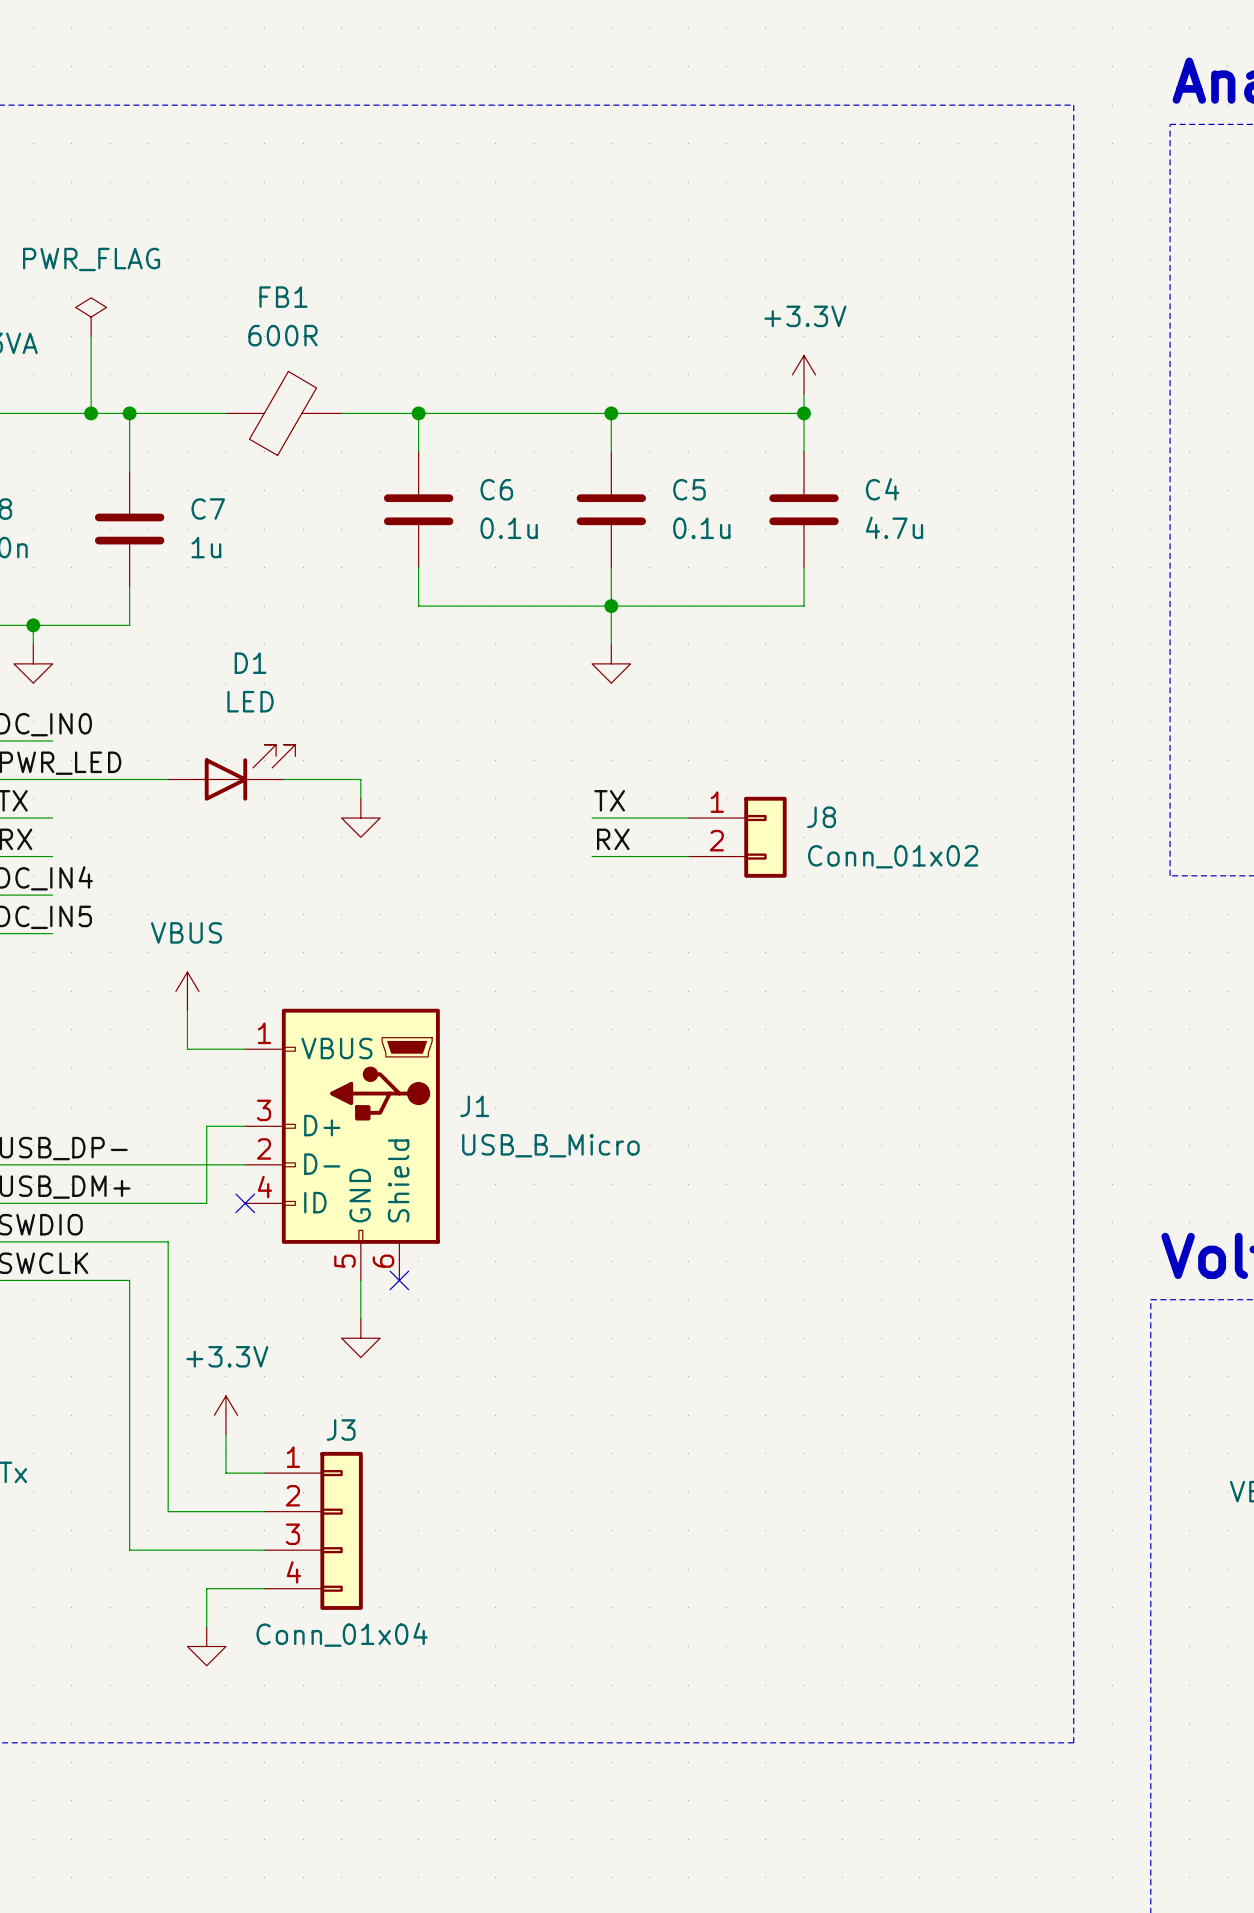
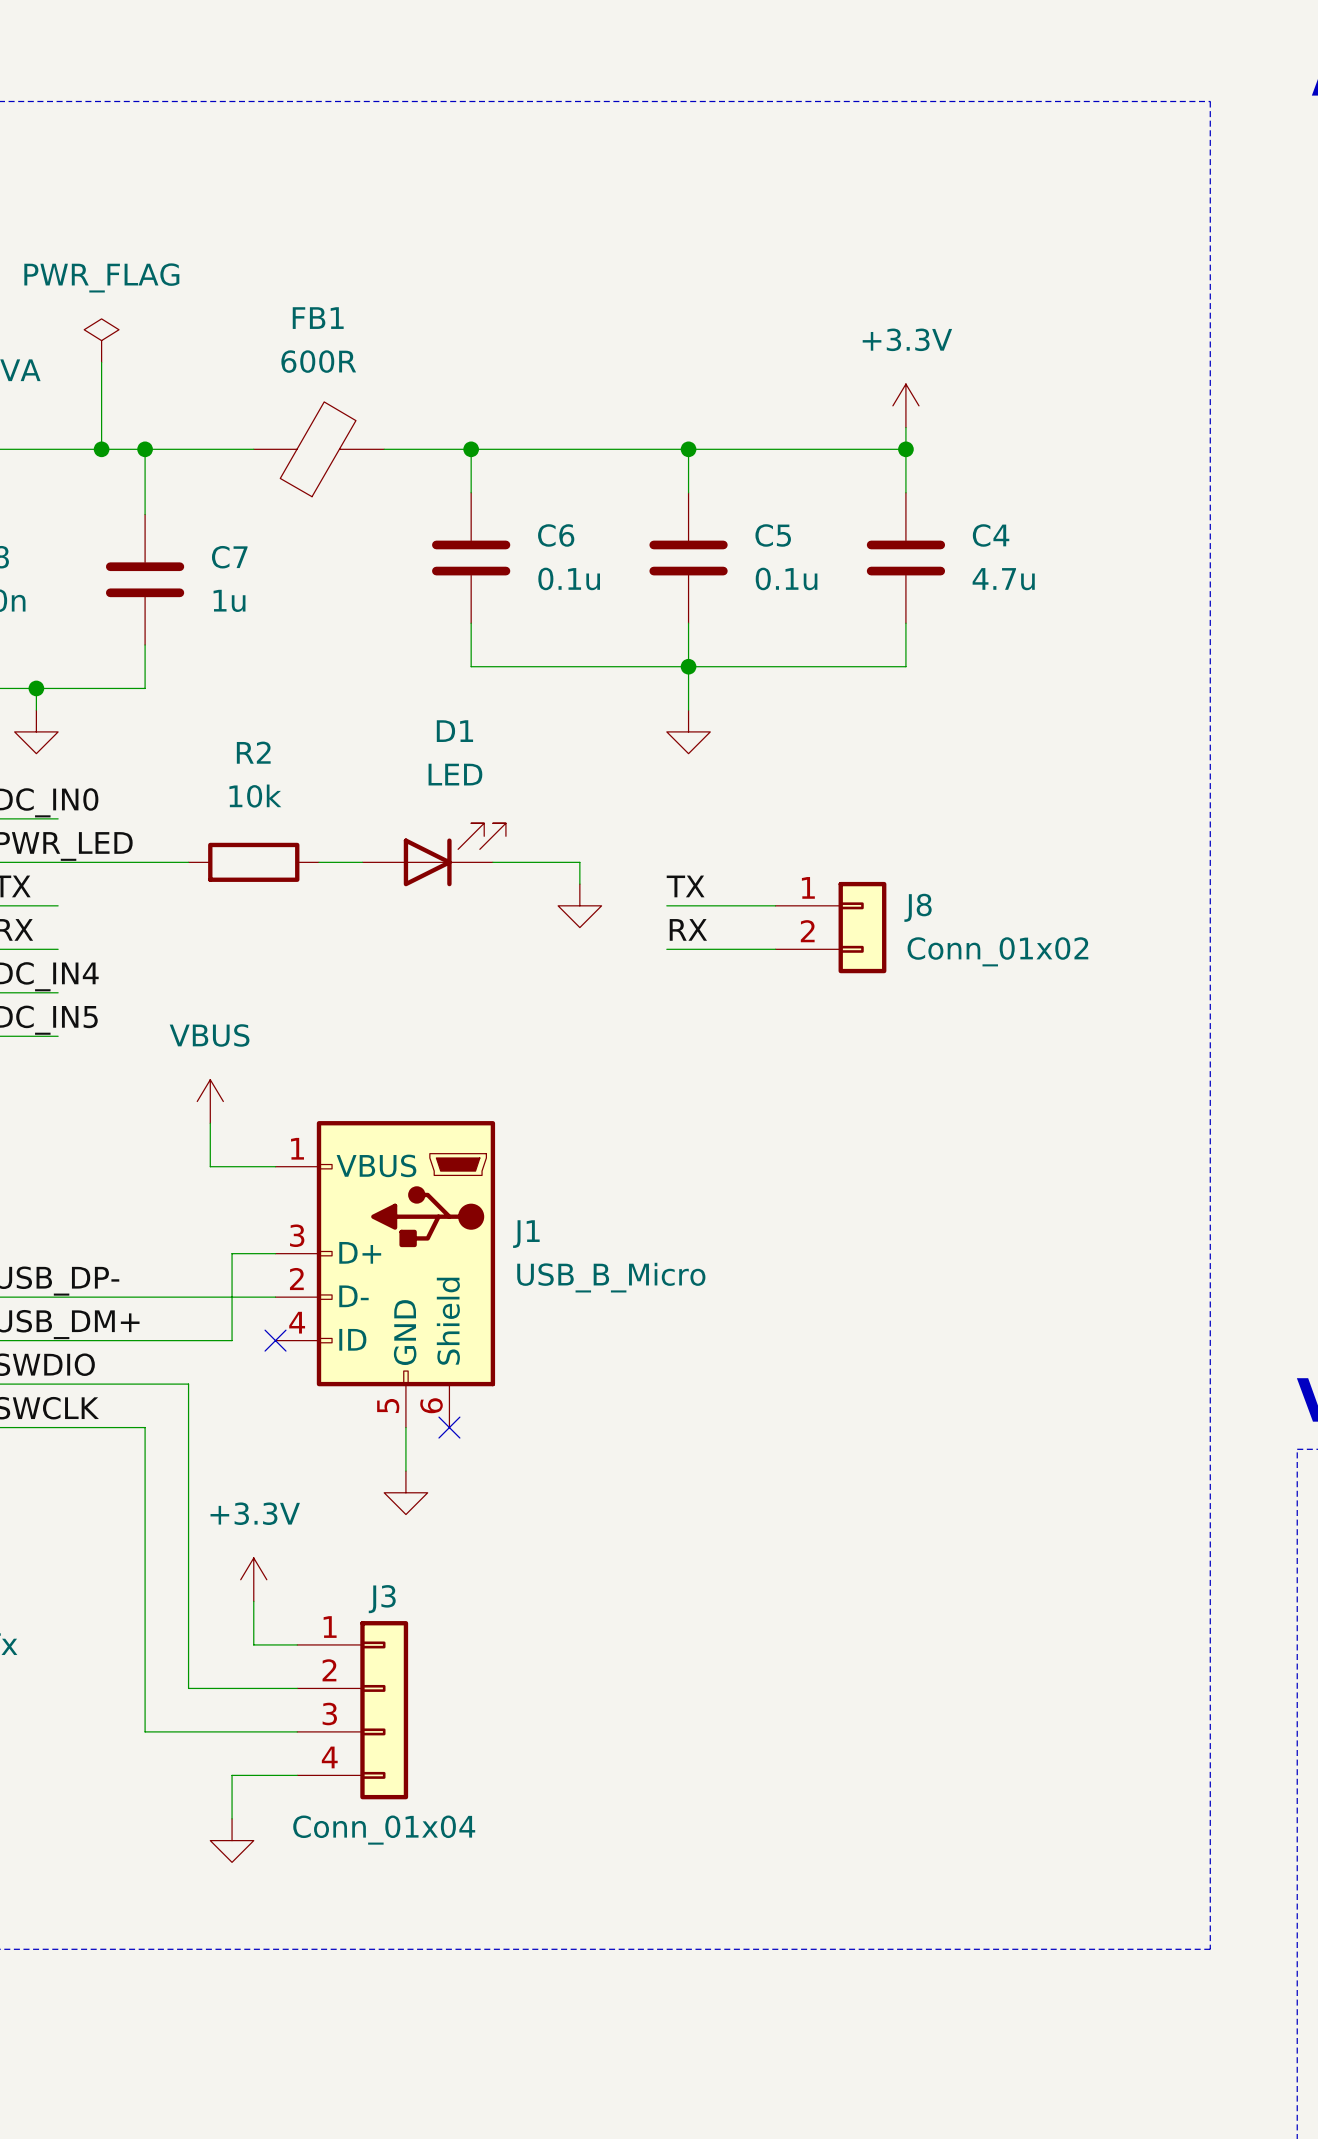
D1 position: (231, 772) -> (434, 854)
R2: none -> 10k (253, 862)
wire: none -> (492, 862) (579, 862) (579, 884)
power symbol position: (360, 818) -> (579, 905)

